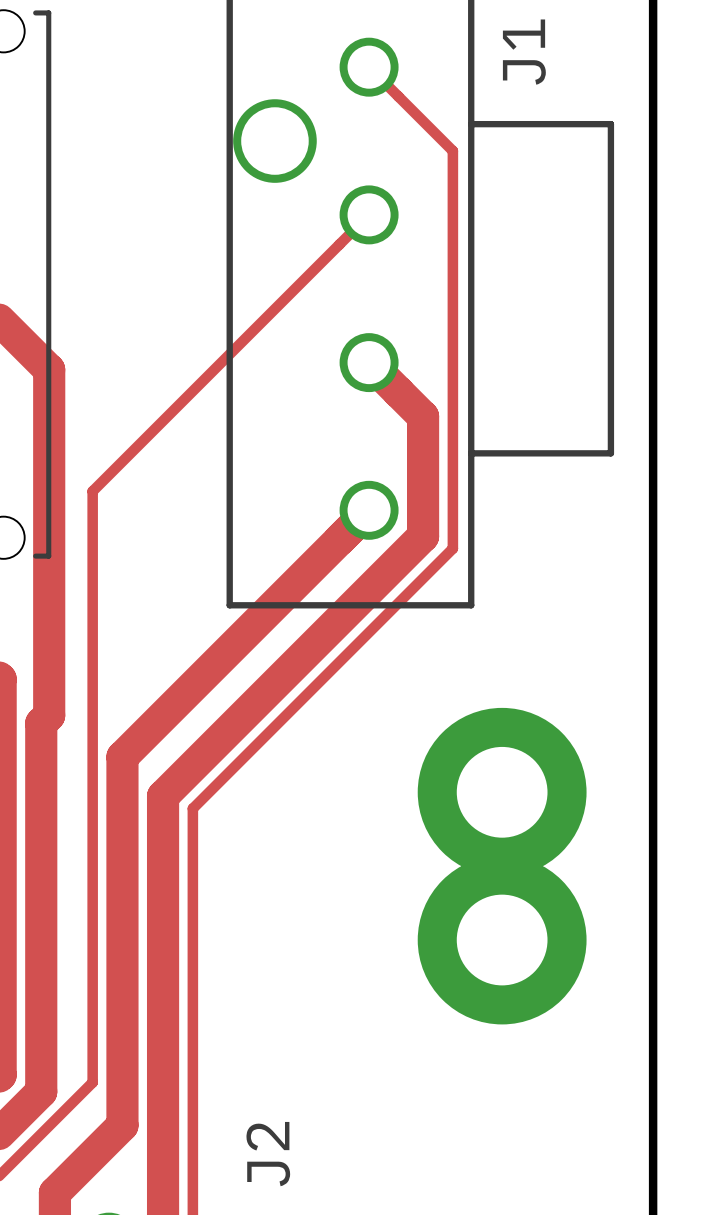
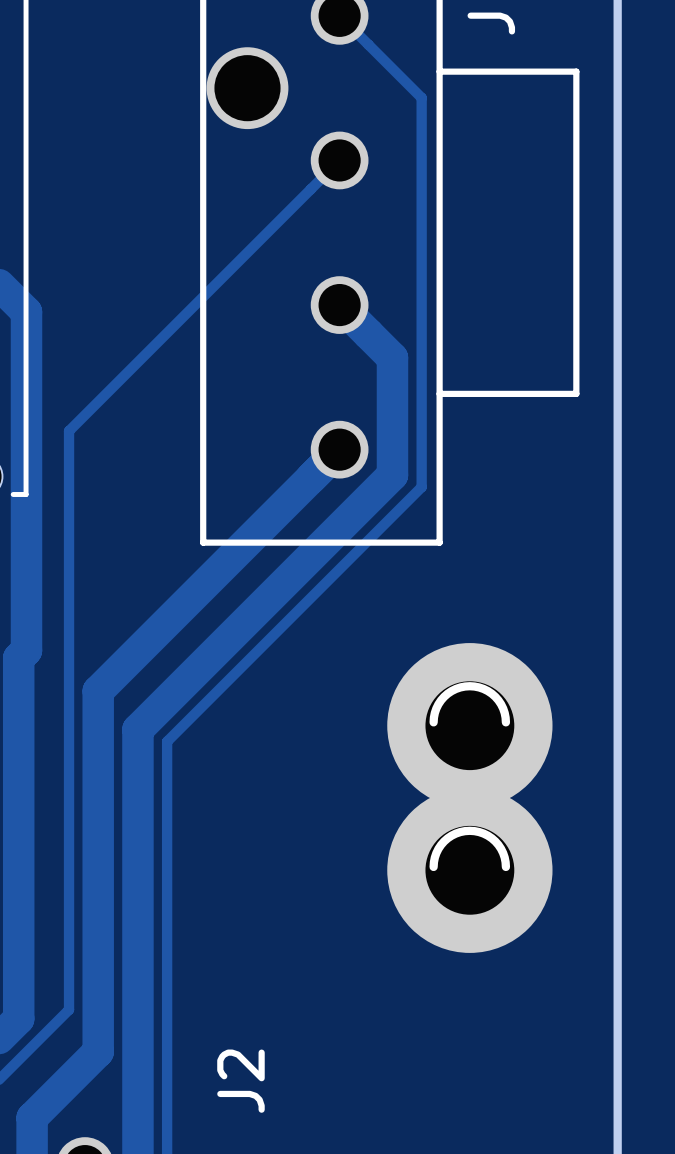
line: none -> (433, 722) (436, 708) (444, 696) (455, 688) (469, 686) (483, 688) (495, 696) (503, 708) (505, 722)
line: none -> (433, 866) (436, 853) (444, 841) (455, 833) (469, 830) (483, 833) (495, 841) (503, 853) (505, 866)

